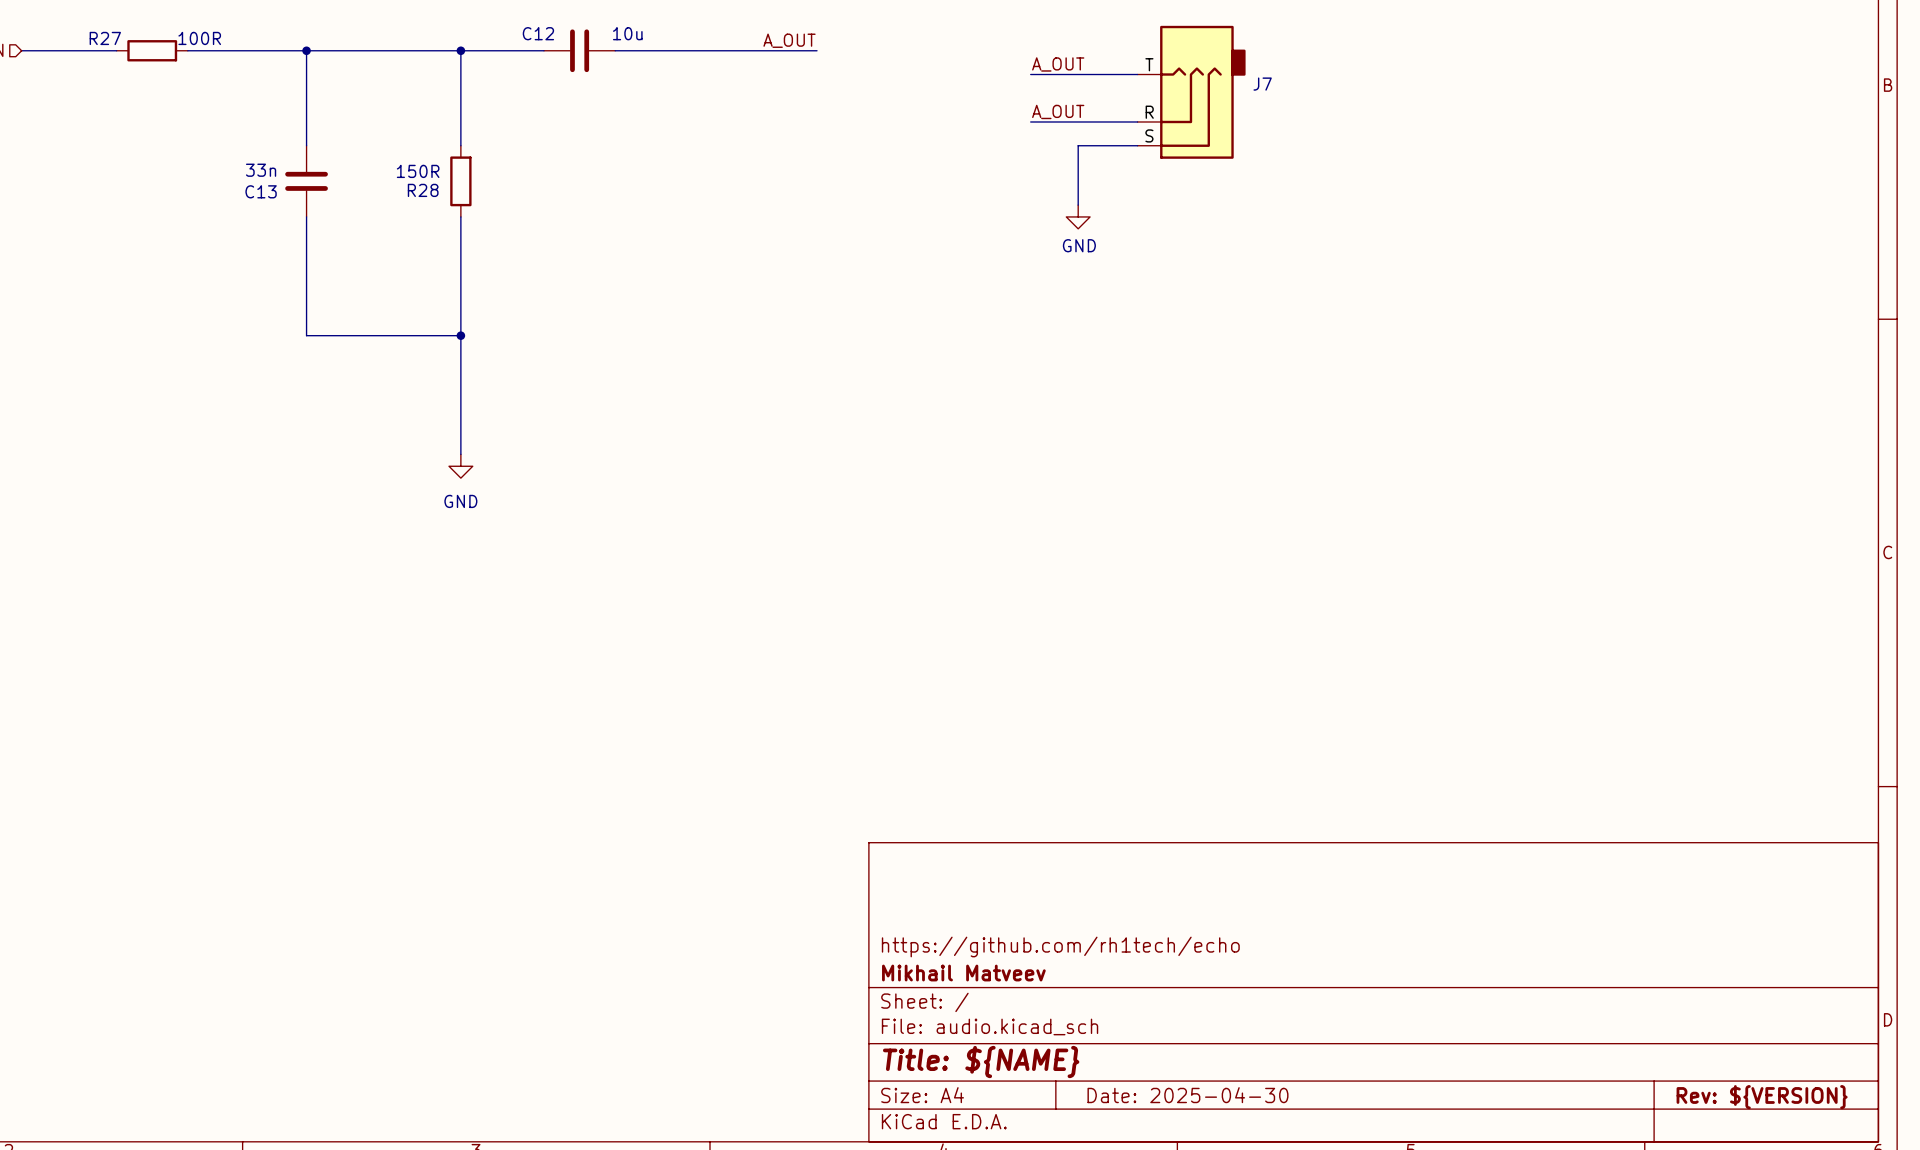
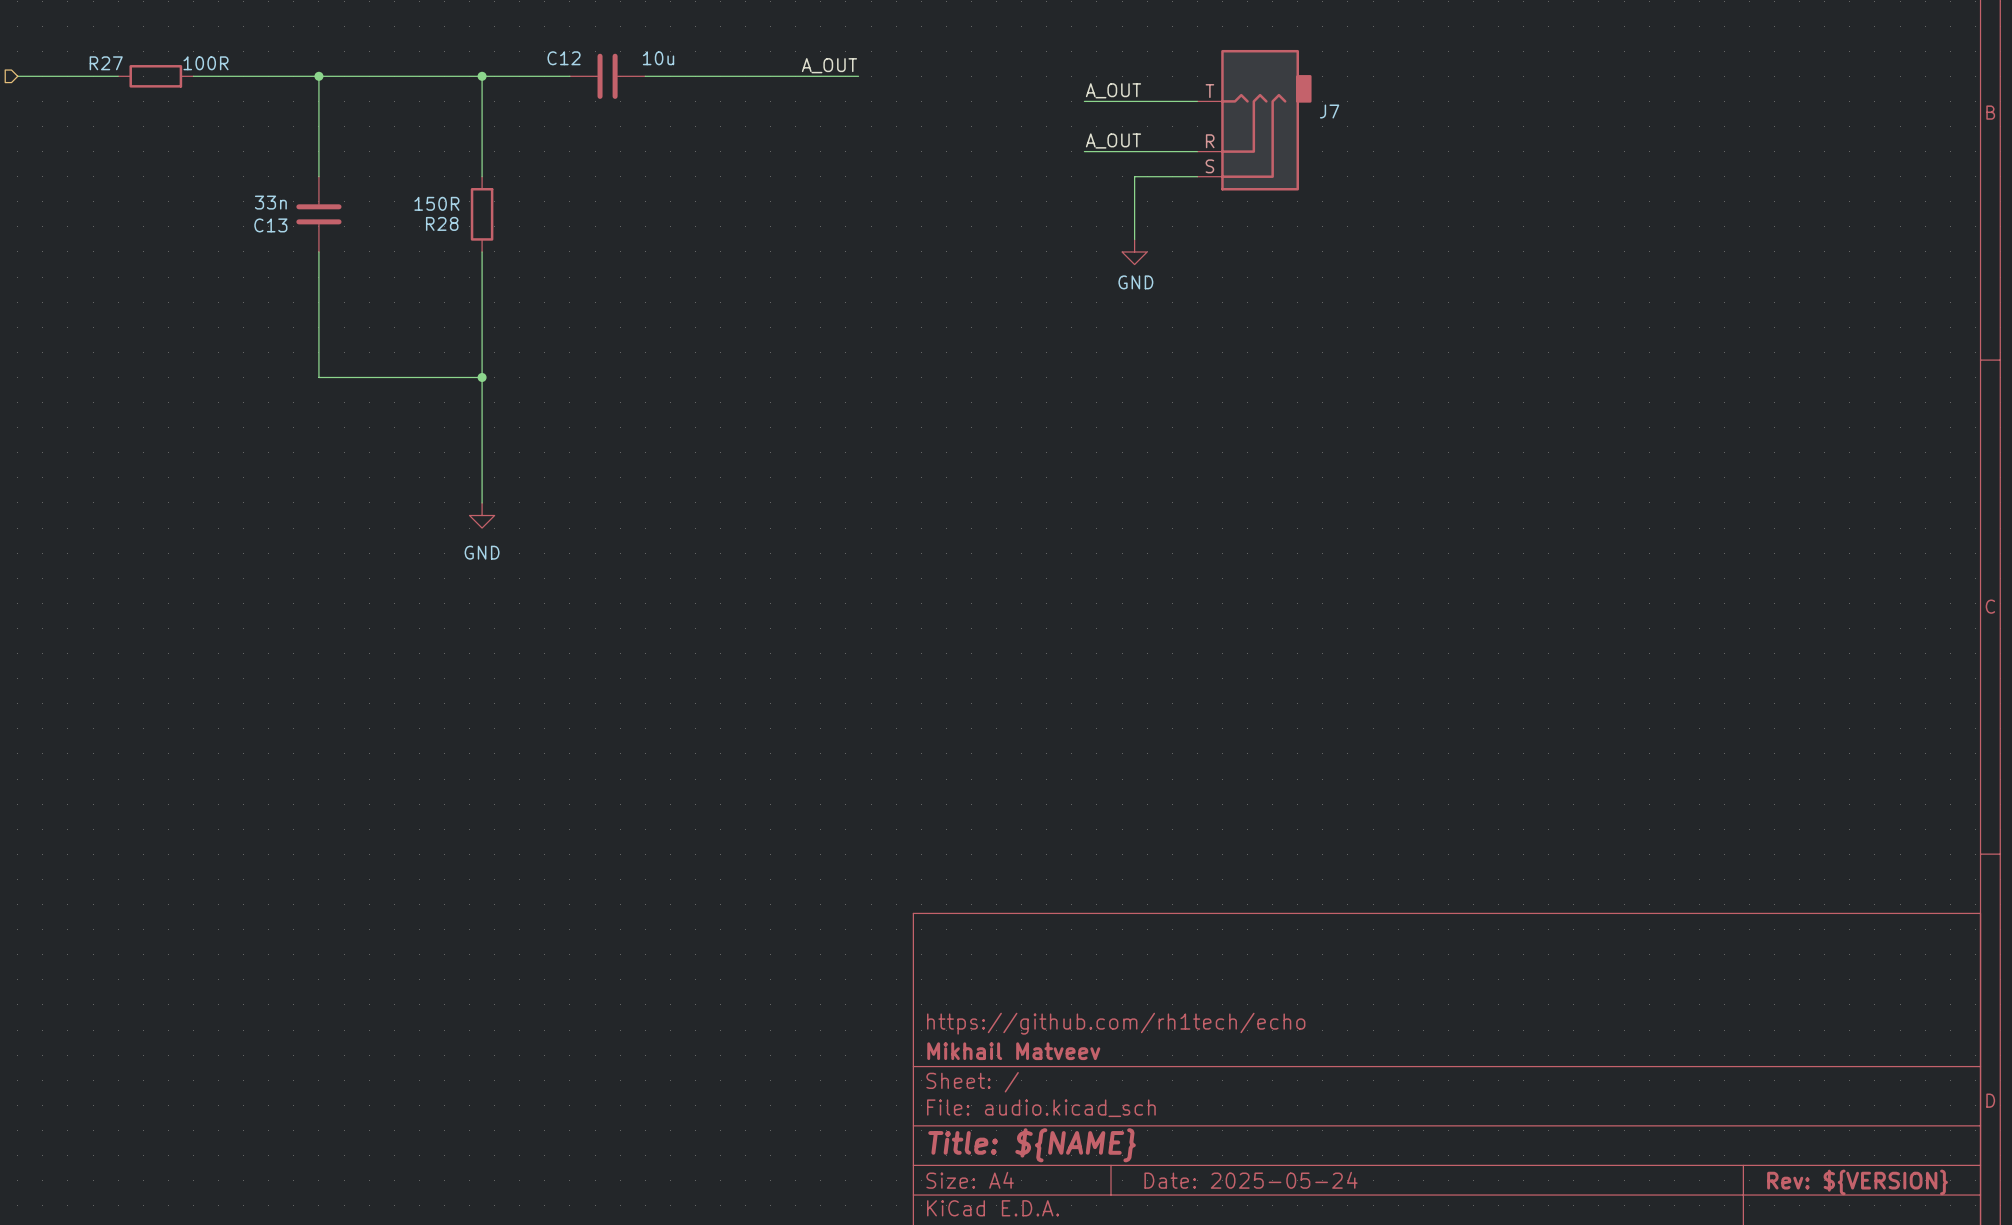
title block: Date: 2025-04-30 (1187, 1095) -> Date: 2025-05-24 (1251, 1180)

